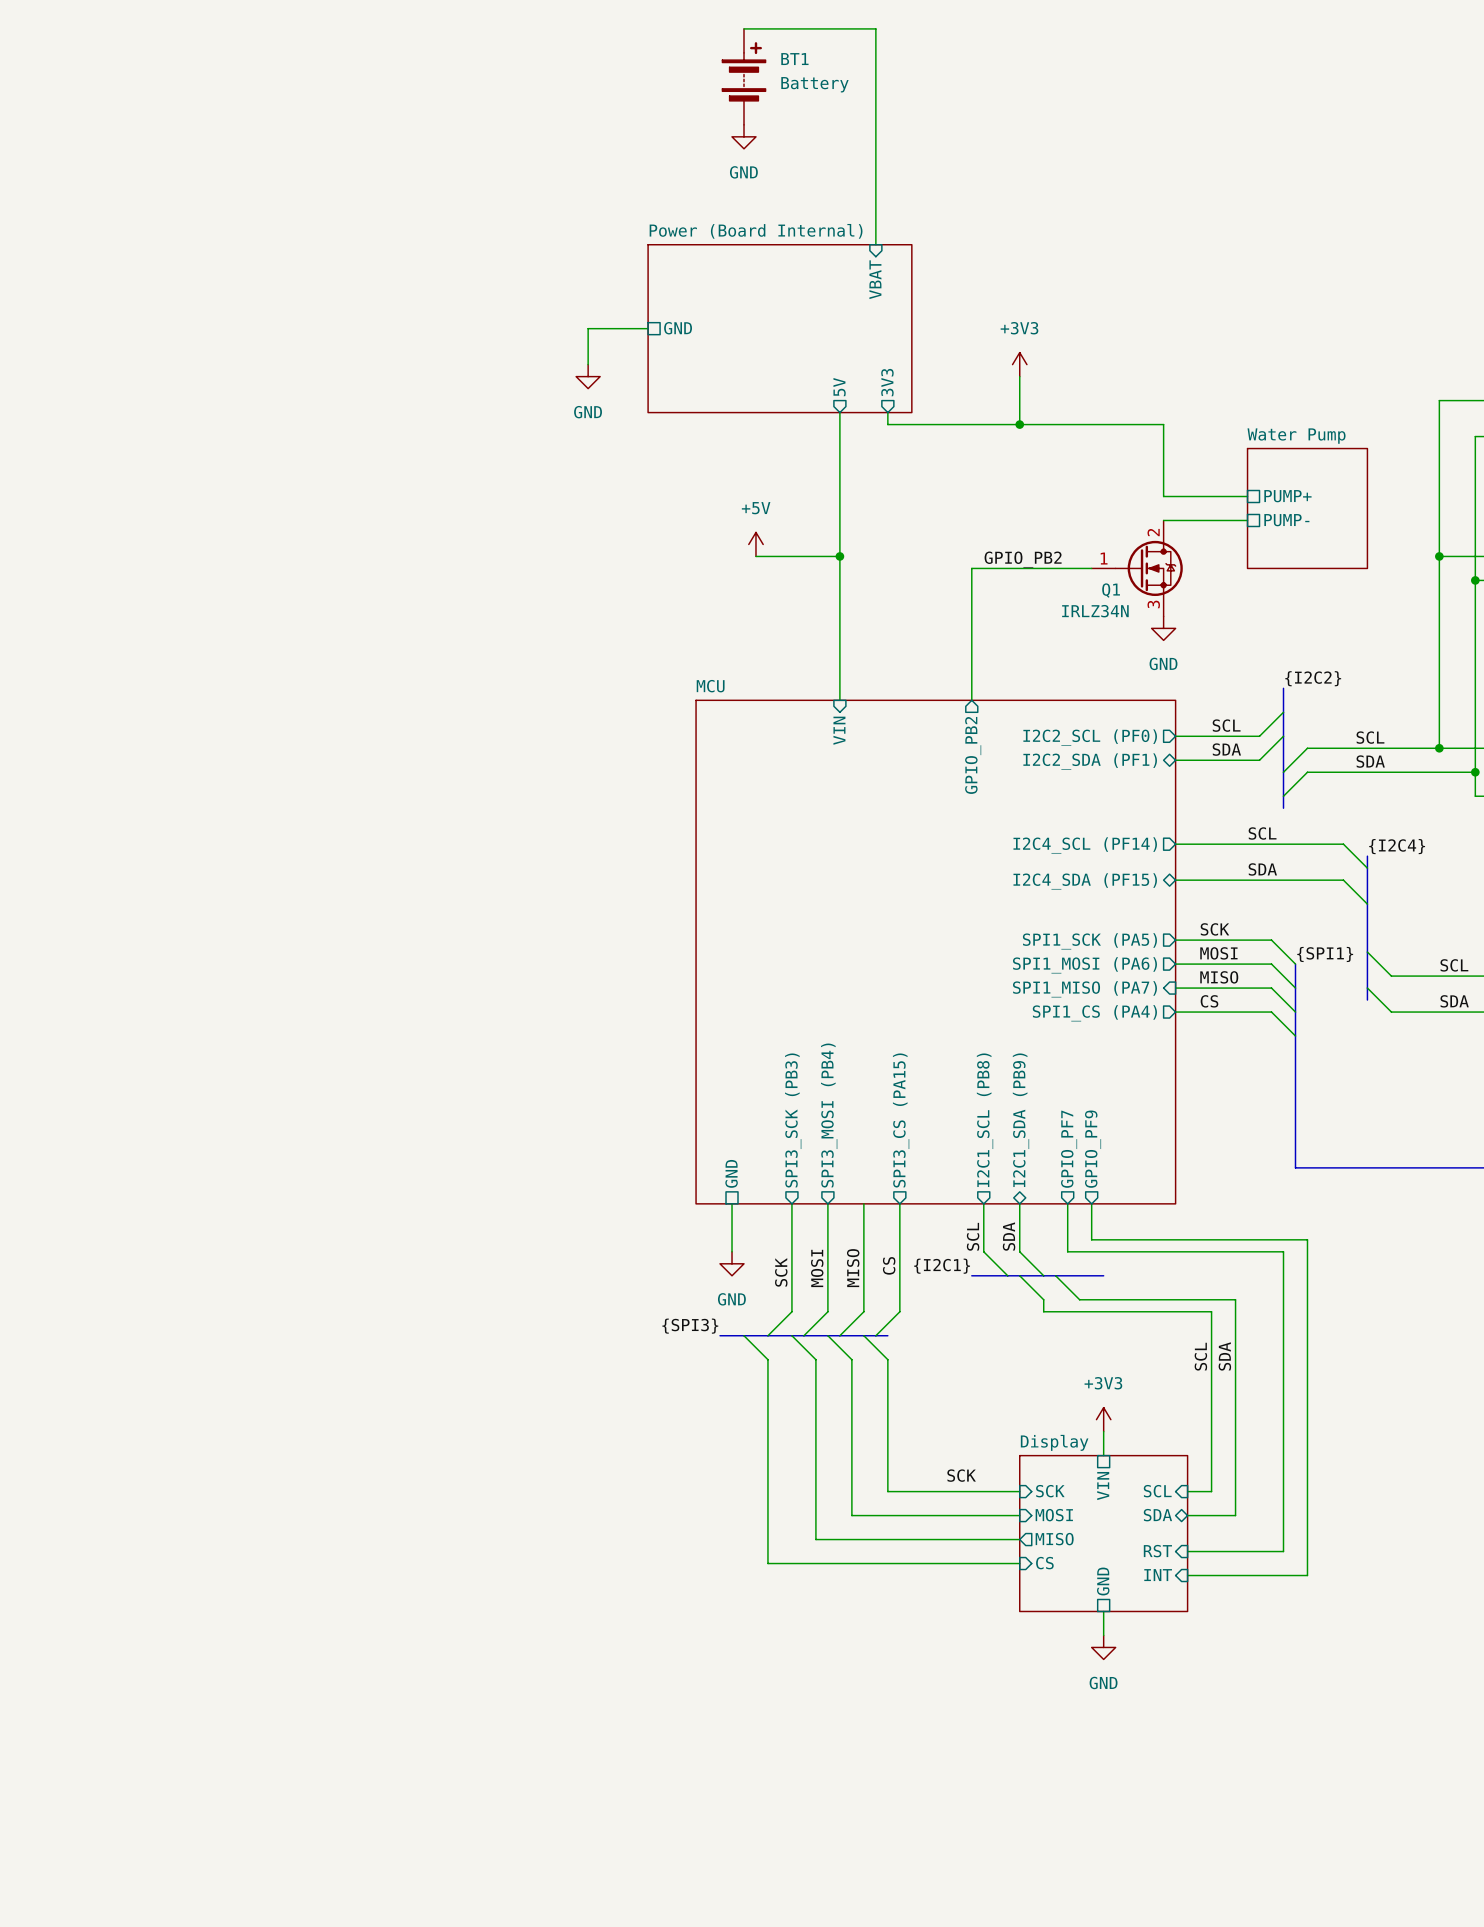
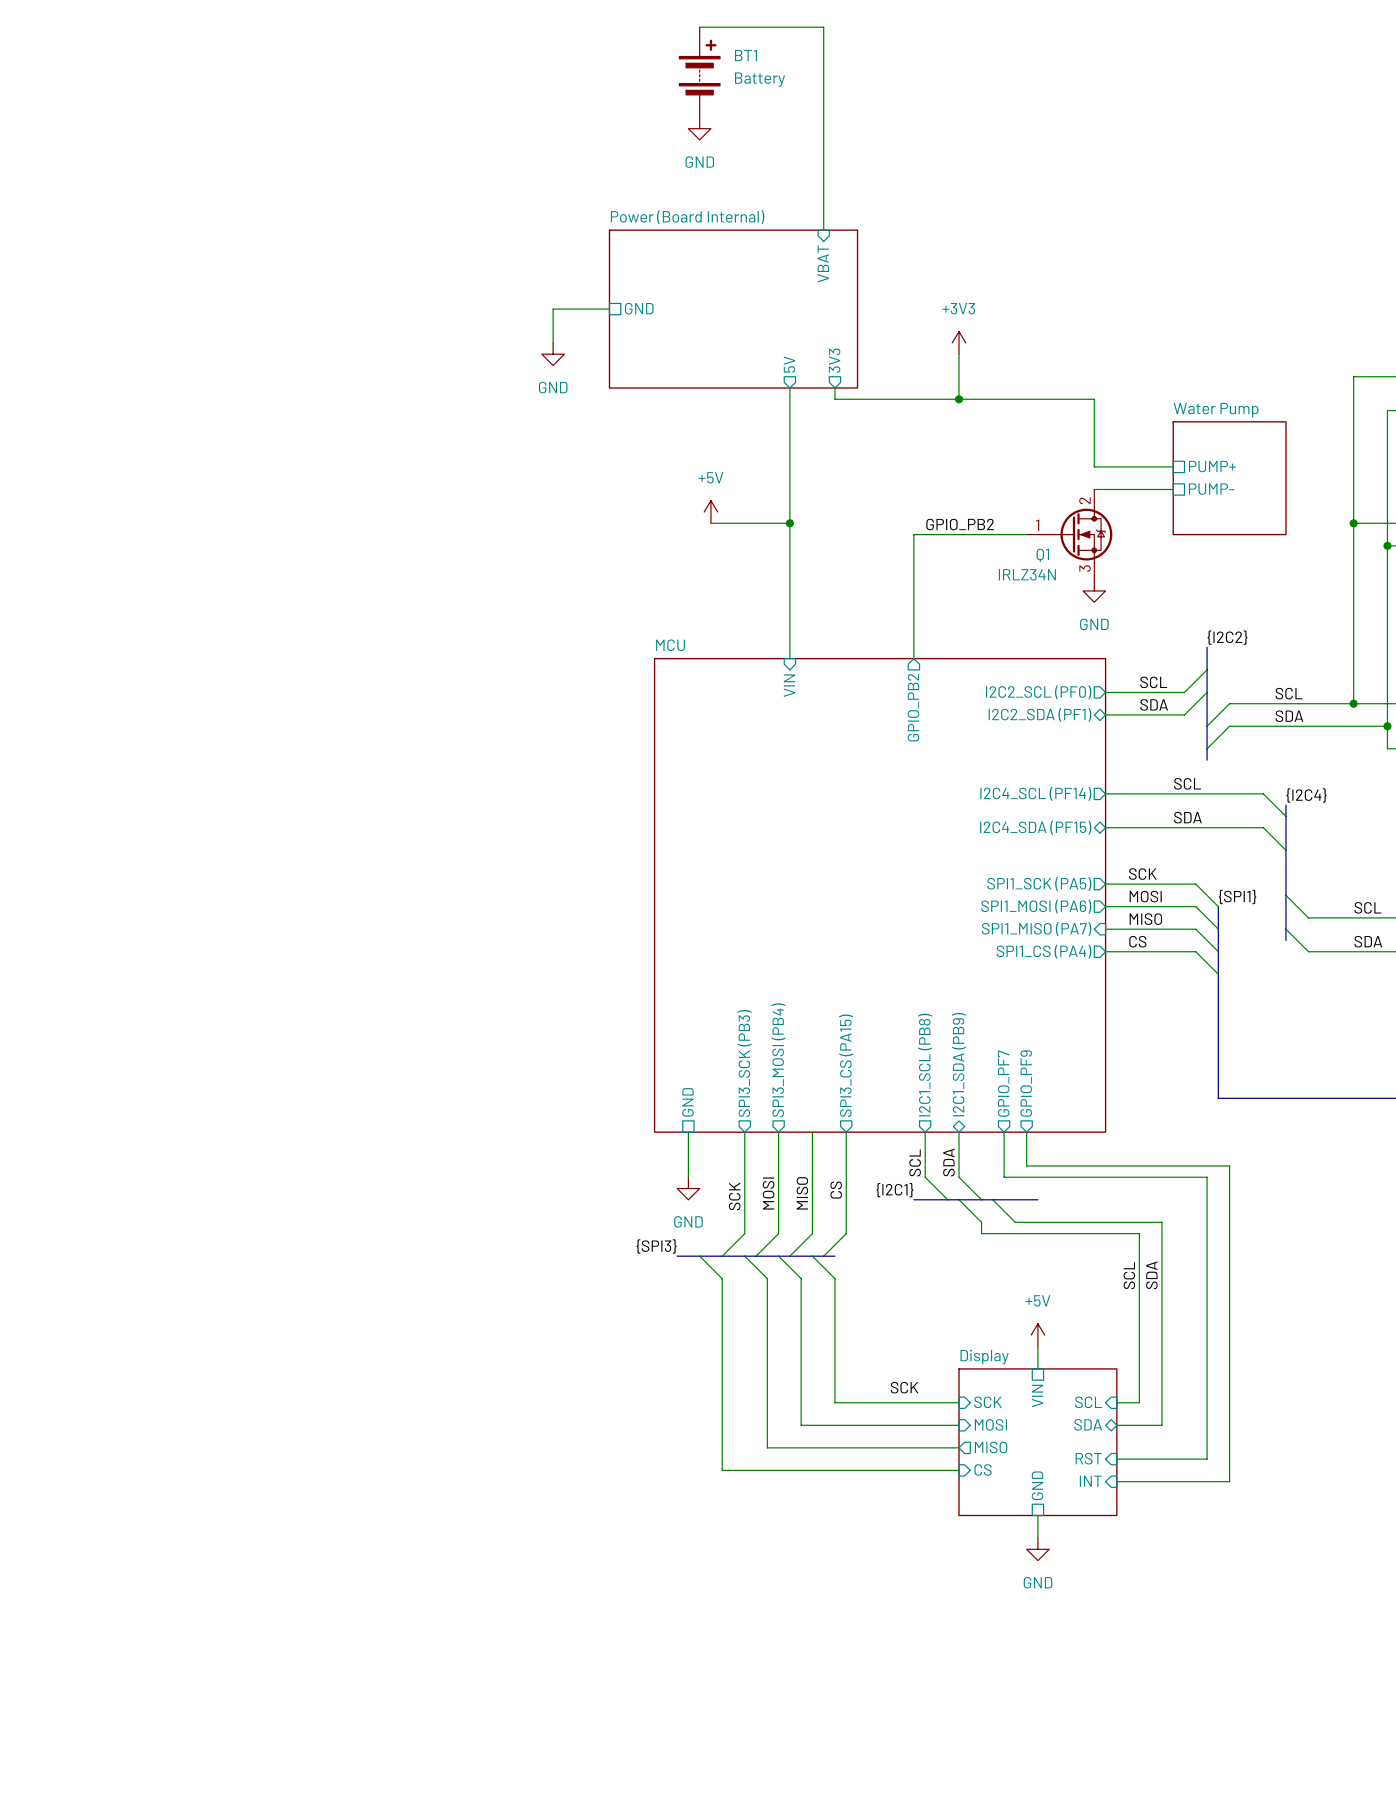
power symbol: +3V3 (1103, 1419) -> +5V (1037, 1335)

